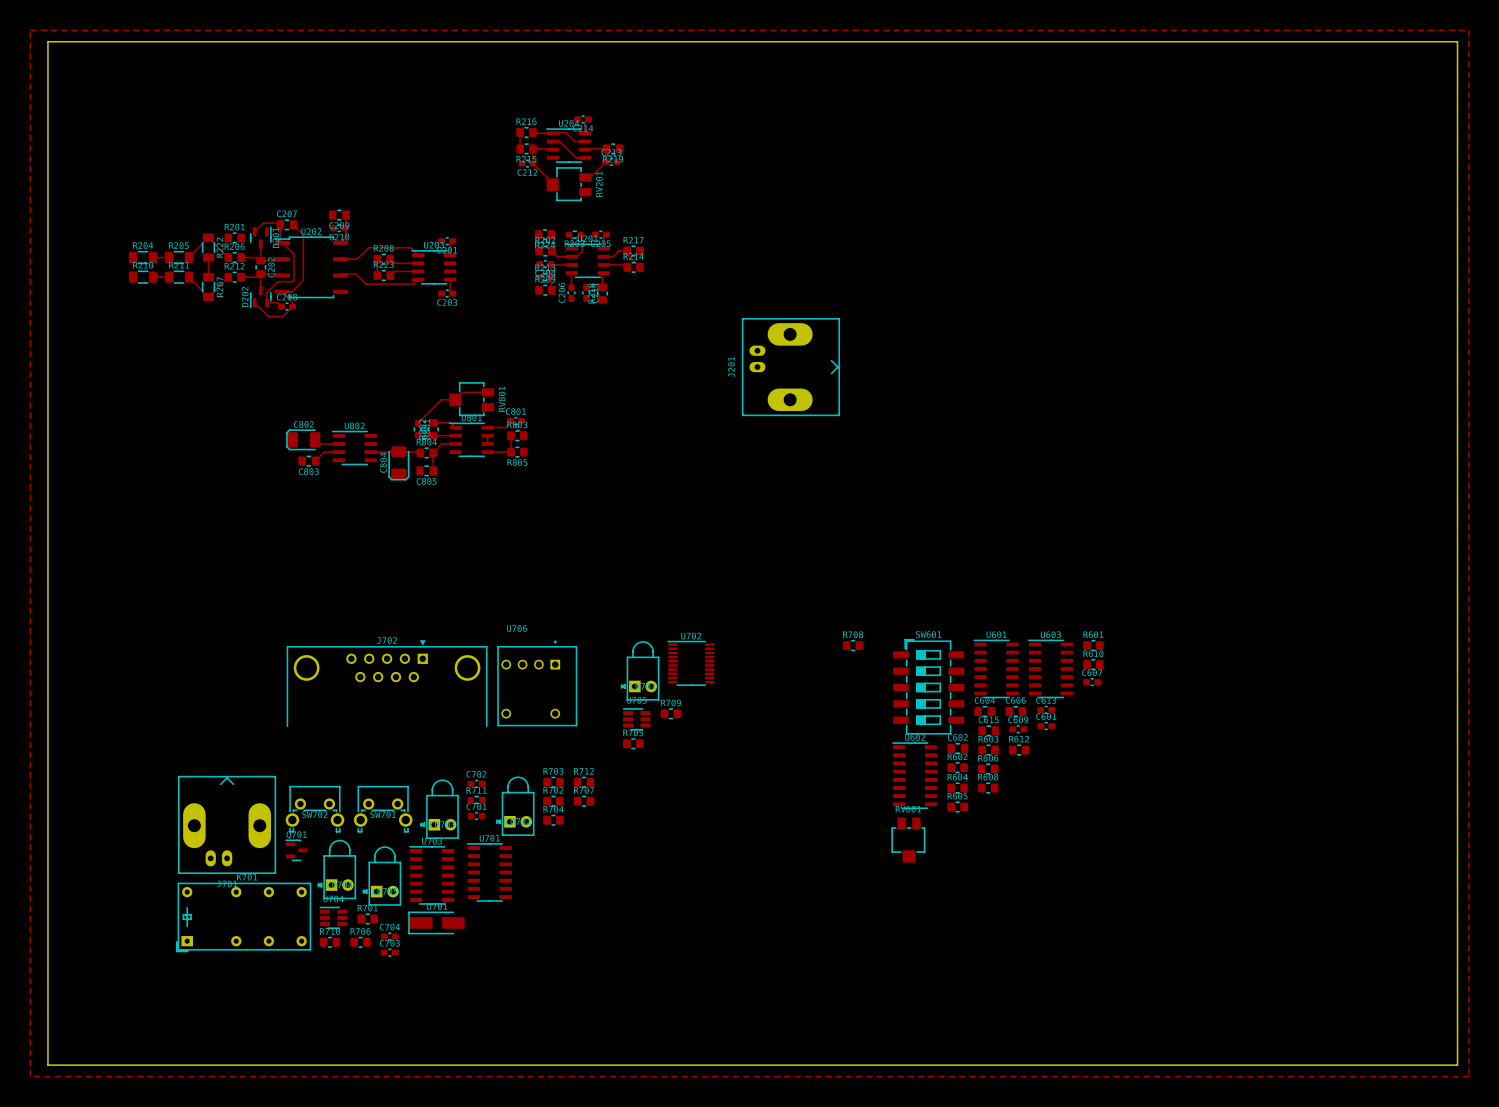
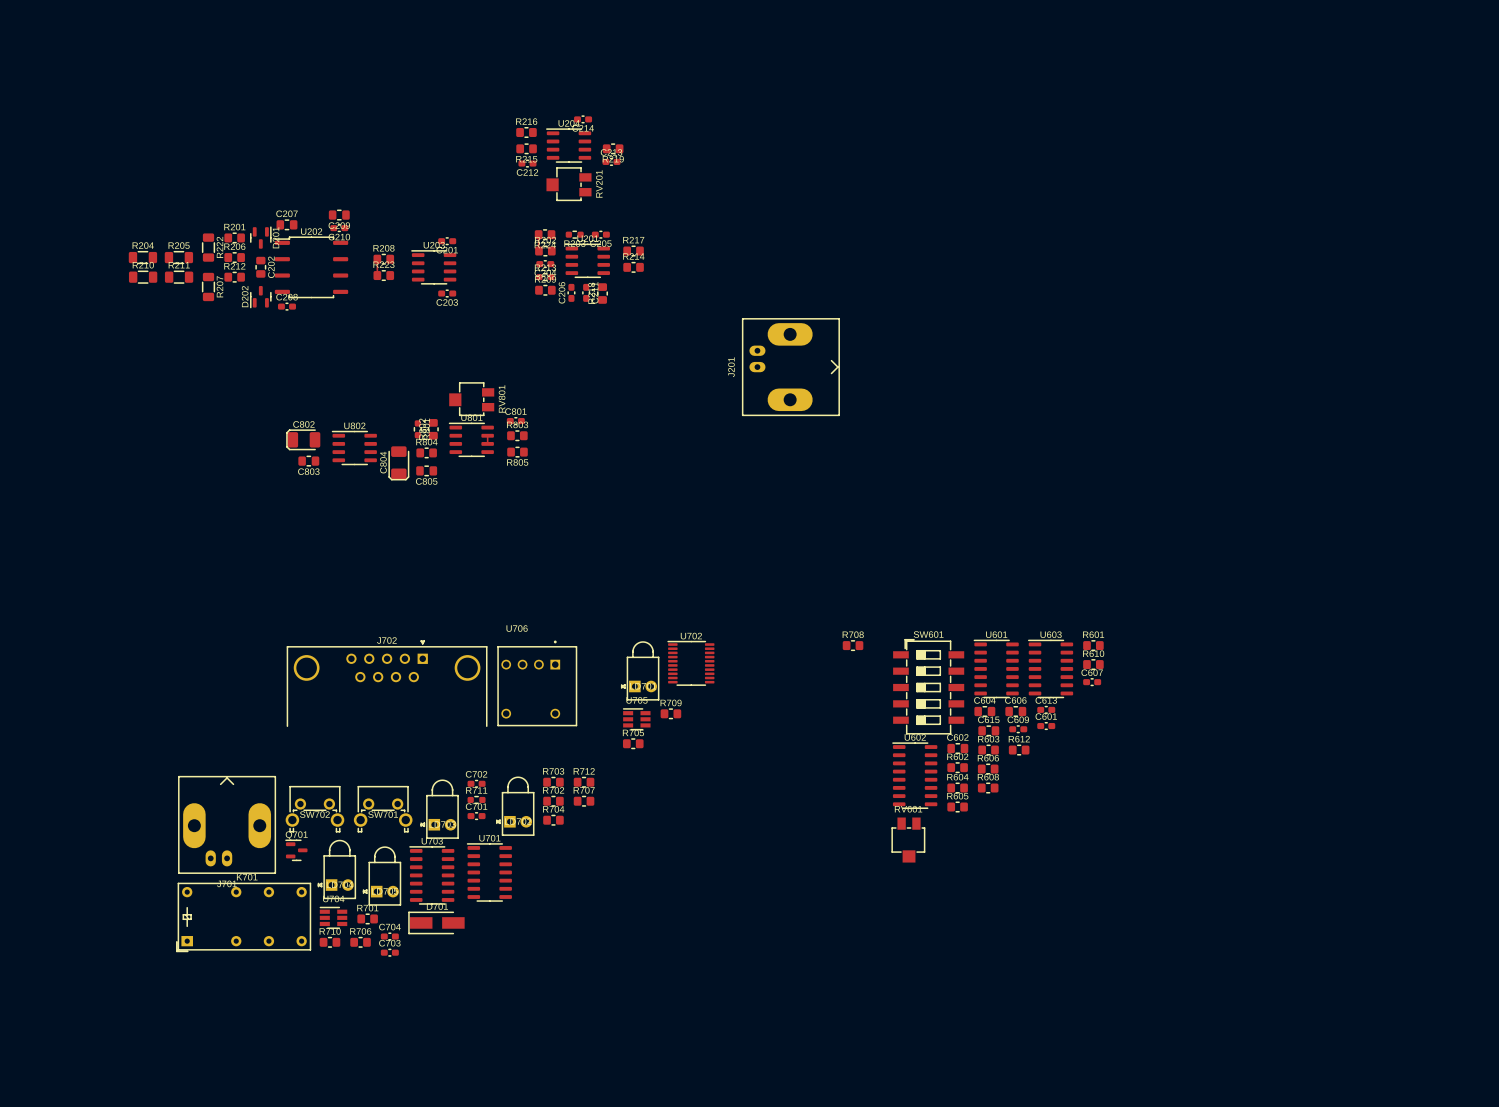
top zone outline: (30, 30) (30, 1076) (1468, 1076) (1468, 30) (30, 30) -> none
board edge: (47, 41) (47, 1065) (1457, 1065) (1457, 41) (47, 41) -> none
top track: (588, 119) (584, 123) (584, 133) -> none
top track: (520, 132) (520, 148) -> none
top track: (532, 132) (565, 132) (574, 141) (584, 141) -> none
top track: (553, 141) (560, 141) (576, 157) (584, 157) -> none
top track: (553, 149) (533, 148) (533, 163) (552, 184) -> none
top track: (584, 149) (606, 148) (605, 161) (590, 177) (585, 177) -> none
top track: (345, 215) (345, 237) (340, 242) -> none
top track: (293, 224) (303, 234) (303, 280) (291, 291) (282, 291) -> none
top track: (254, 231) (263, 223) (278, 223) (280, 224) (280, 240) (293, 254) (293, 279) (277, 281) (266, 292) (266, 302) (277, 302) (281, 306) -> none
top track: (568, 234) (571, 237) (571, 248) -> none
top track: (580, 234) (582, 251) (577, 256) (557, 256) (551, 251) -> none
top track: (606, 234) (603, 237) (603, 248) -> none
top track: (452, 241) (450, 243) (450, 255) -> none
top track: (260, 243) (260, 260) -> none
top track: (418, 255) (410, 247) (368, 247) (357, 259) (340, 259) -> none
top track: (603, 256) (613, 256) (618, 251) (627, 251) (627, 254) (640, 267) -> none
top track: (152, 257) (168, 257) -> none
top track: (188, 257) (208, 237) (228, 257) -> none
top track: (208, 257) (208, 277) -> none
top track: (241, 257) (257, 257) (260, 260) -> none
top track: (282, 259) (260, 260) -> none
top track: (390, 259) (394, 263) (418, 263) -> none
top track: (571, 264) (550, 264) (551, 290) -> none
top track: (603, 264) (624, 264) (627, 267) -> none
top track: (418, 271) (394, 271) (390, 275) -> none
top track: (260, 273) (260, 290) -> none
top track: (260, 273) (257, 277) (241, 277) -> none
top track: (260, 273) (282, 275) -> none
top track: (571, 273) (571, 287) -> none
top track: (603, 273) (602, 287) (586, 287) -> none
top track: (340, 275) (355, 273) (365, 284) (413, 284) (418, 279) -> none
top track: (153, 277) (169, 277) -> none
top track: (189, 277) (208, 296) -> none
top track: (228, 277) (208, 296) -> none
top track: (450, 279) (450, 290) (452, 293) -> none
top track: (282, 291) (292, 302) (292, 306) (282, 316) (268, 316) (254, 302) -> none
top track: (488, 392) (462, 392) (455, 399) (441, 399) (417, 423) -> none
top track: (510, 421) (505, 427) (487, 427) -> none
top track: (510, 421) (523, 435) -> none
top track: (433, 422) (451, 422) (455, 427) -> none
top track: (417, 435) (455, 435) -> none
top track: (510, 435) (511, 452) (487, 452) -> none
top track: (315, 439) (319, 443) (338, 443) -> none
top track: (455, 443) (442, 443) (433, 452) (433, 470) -> none
top track: (338, 452) (324, 452) (315, 461) -> none
top track: (370, 452) (420, 452) -> none

